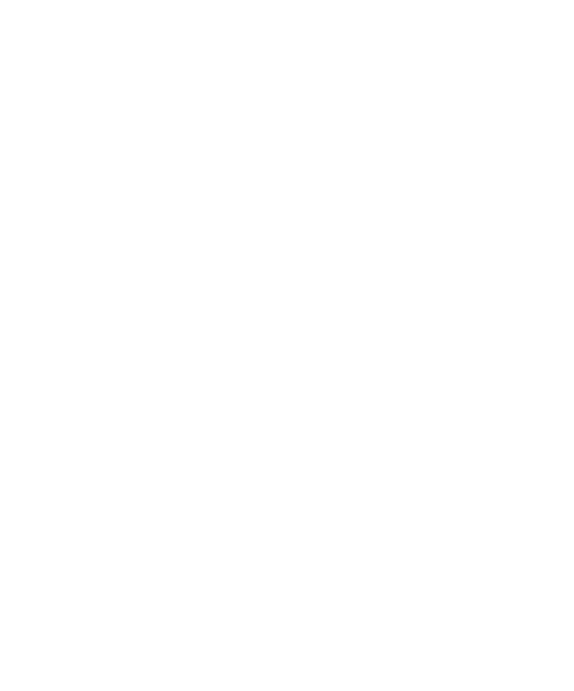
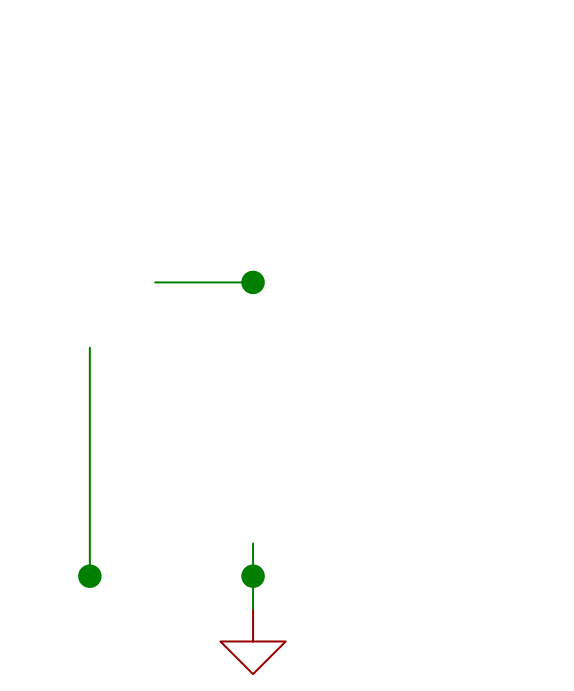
wire: none -> (155, 282) (253, 282)
junction: none -> (253, 282)
wire: none -> (89, 347) (89, 576)
wire: none -> (253, 543) (253, 608)
junction: none -> (89, 576)
junction: none -> (253, 576)
power symbol: none -> (253, 641)

